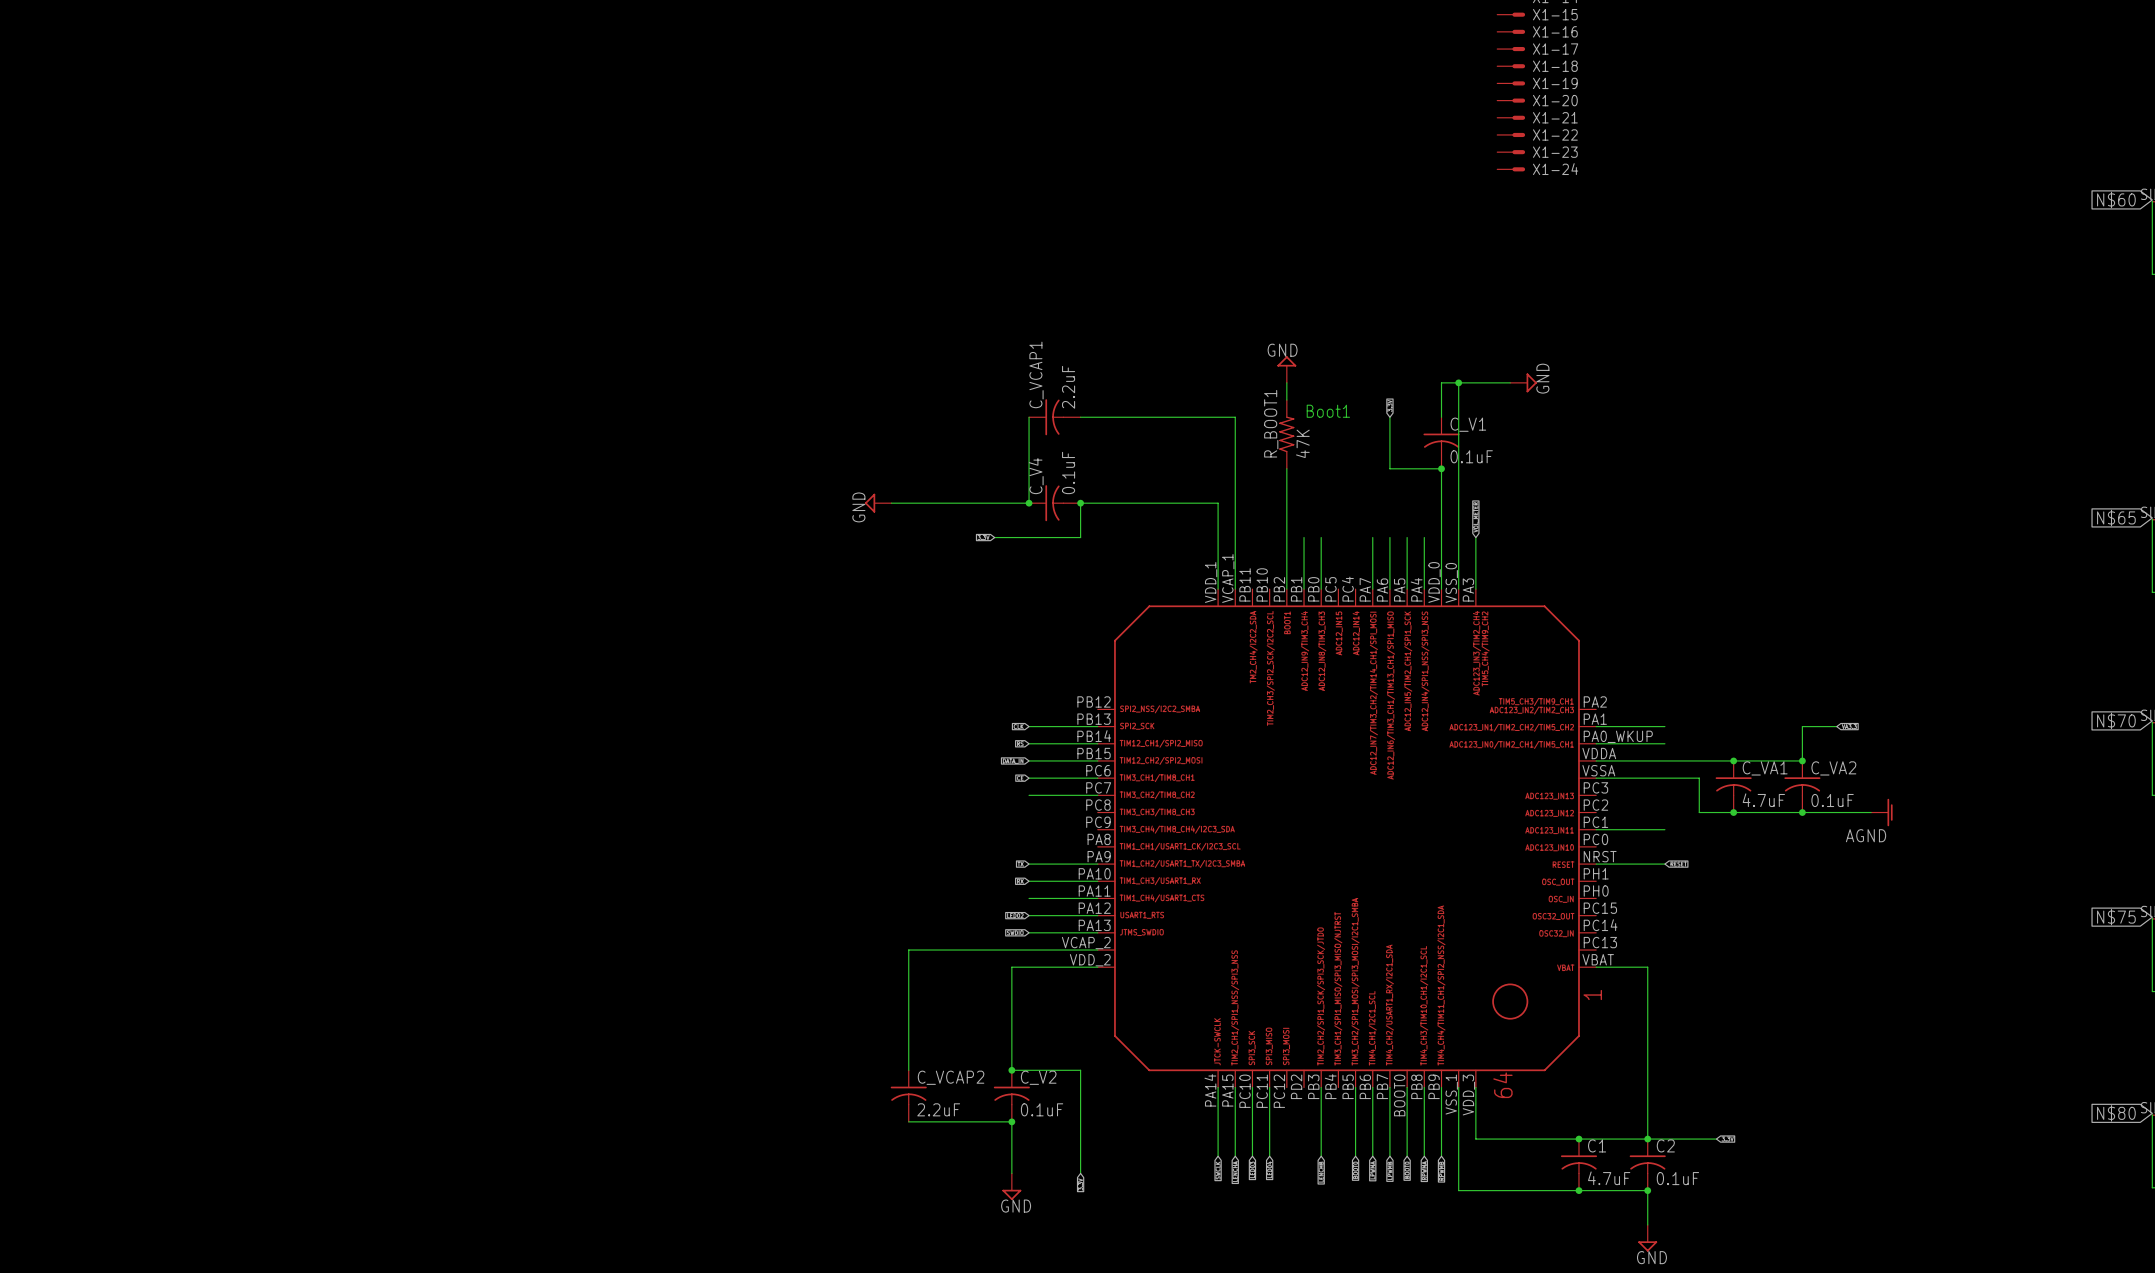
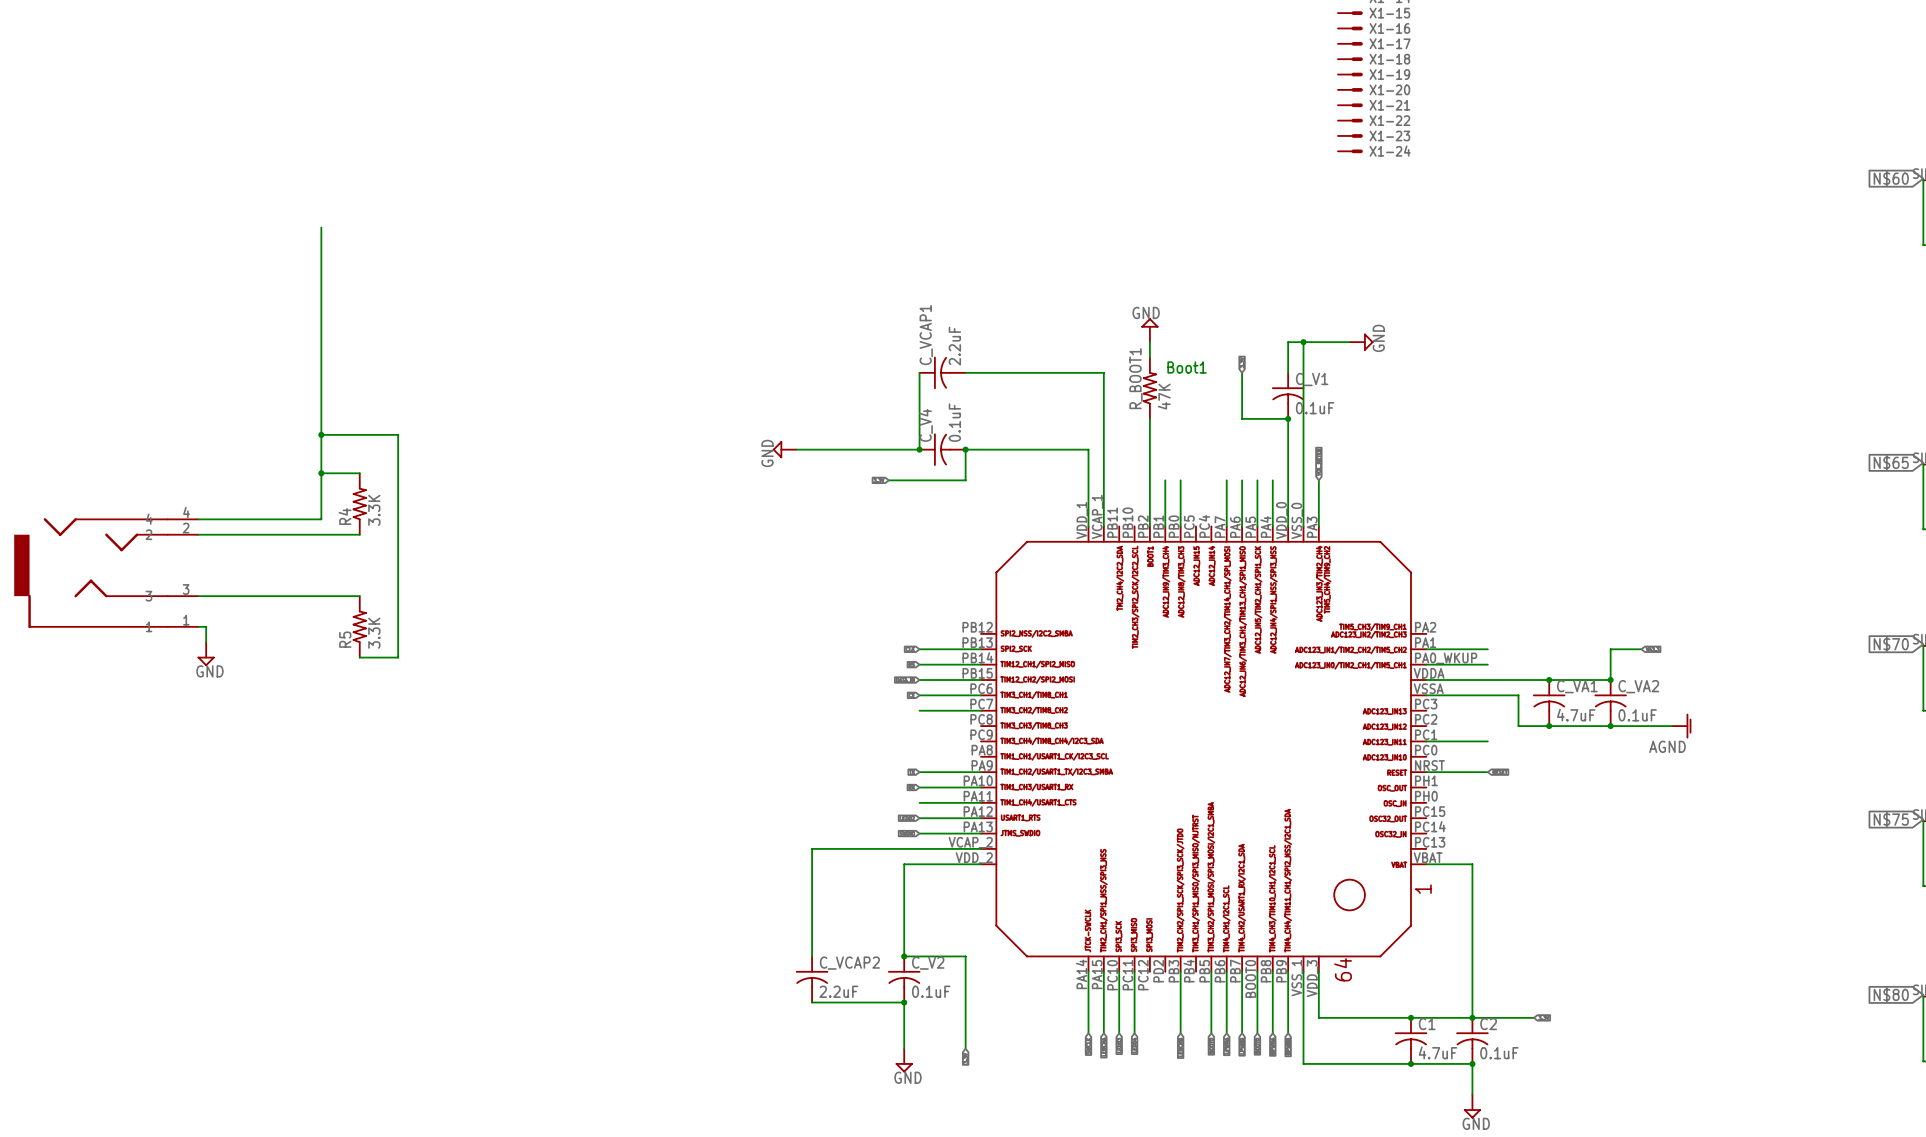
wire: none -> (321, 227) (321, 519) (198, 519)
wire: none -> (321, 434) (398, 434) (398, 657) (359, 657)
junction: none -> (321, 434)
wire: none -> (321, 473) (359, 473)
junction: none -> (321, 473)
R4: none -> 3.3K (359, 504)
wire: none -> (198, 534) (359, 534)
part: none -> (106, 573)
wire: none -> (198, 596) (359, 596)
wire: none -> (198, 626) (206, 626) (206, 642)
R5: none -> 3.3K (359, 626)
power symbol: none -> GND (206, 654)

